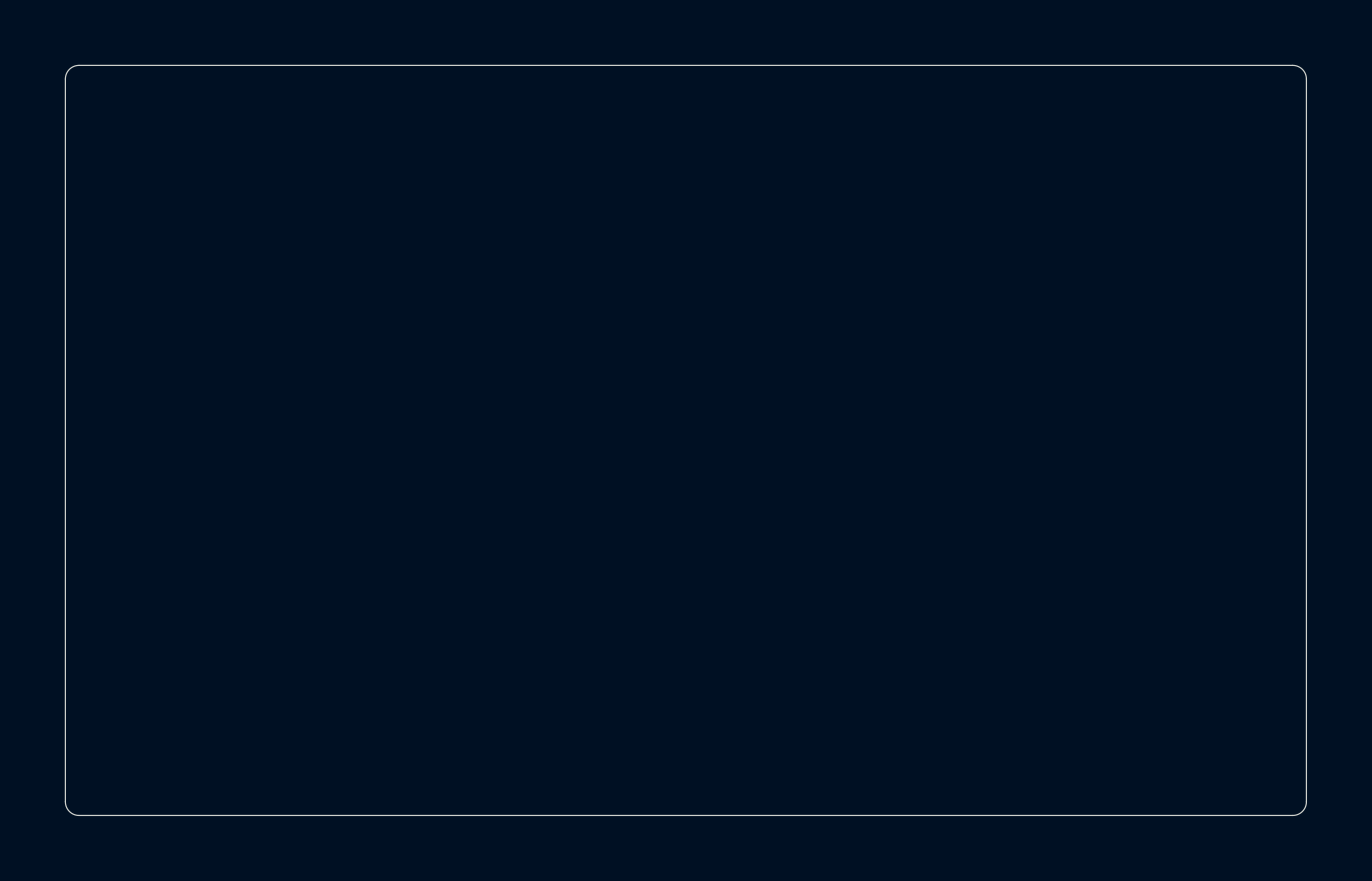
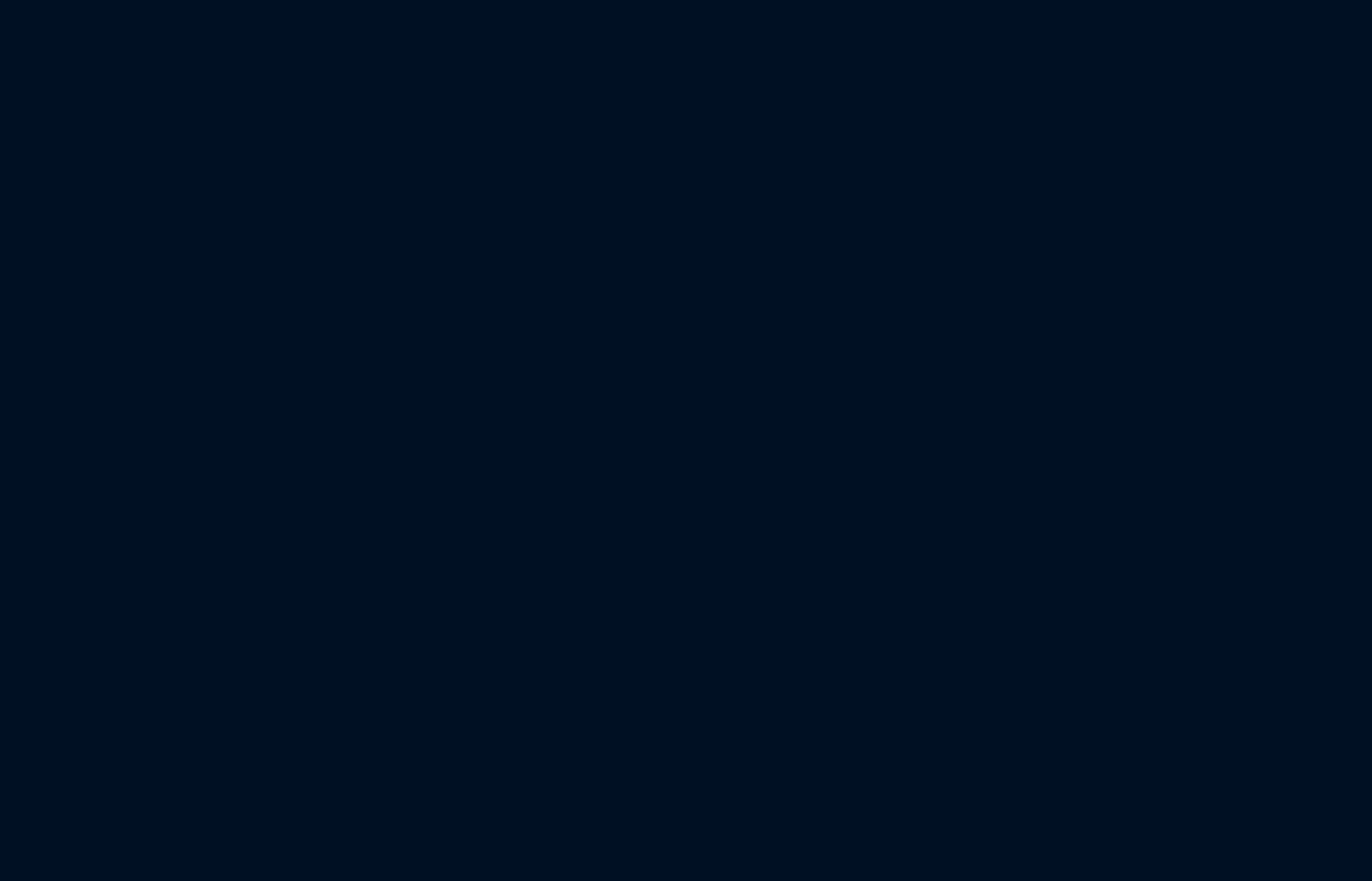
board edge: (79, 65) (1292, 65) (1300, 67) (1305, 73) (1306, 79) (1306, 801) (1304, 809) (1300, 813) (1292, 815) (79, 815) (71, 813) (67, 809) (65, 801) (65, 79) (69, 69) (79, 65) -> none

